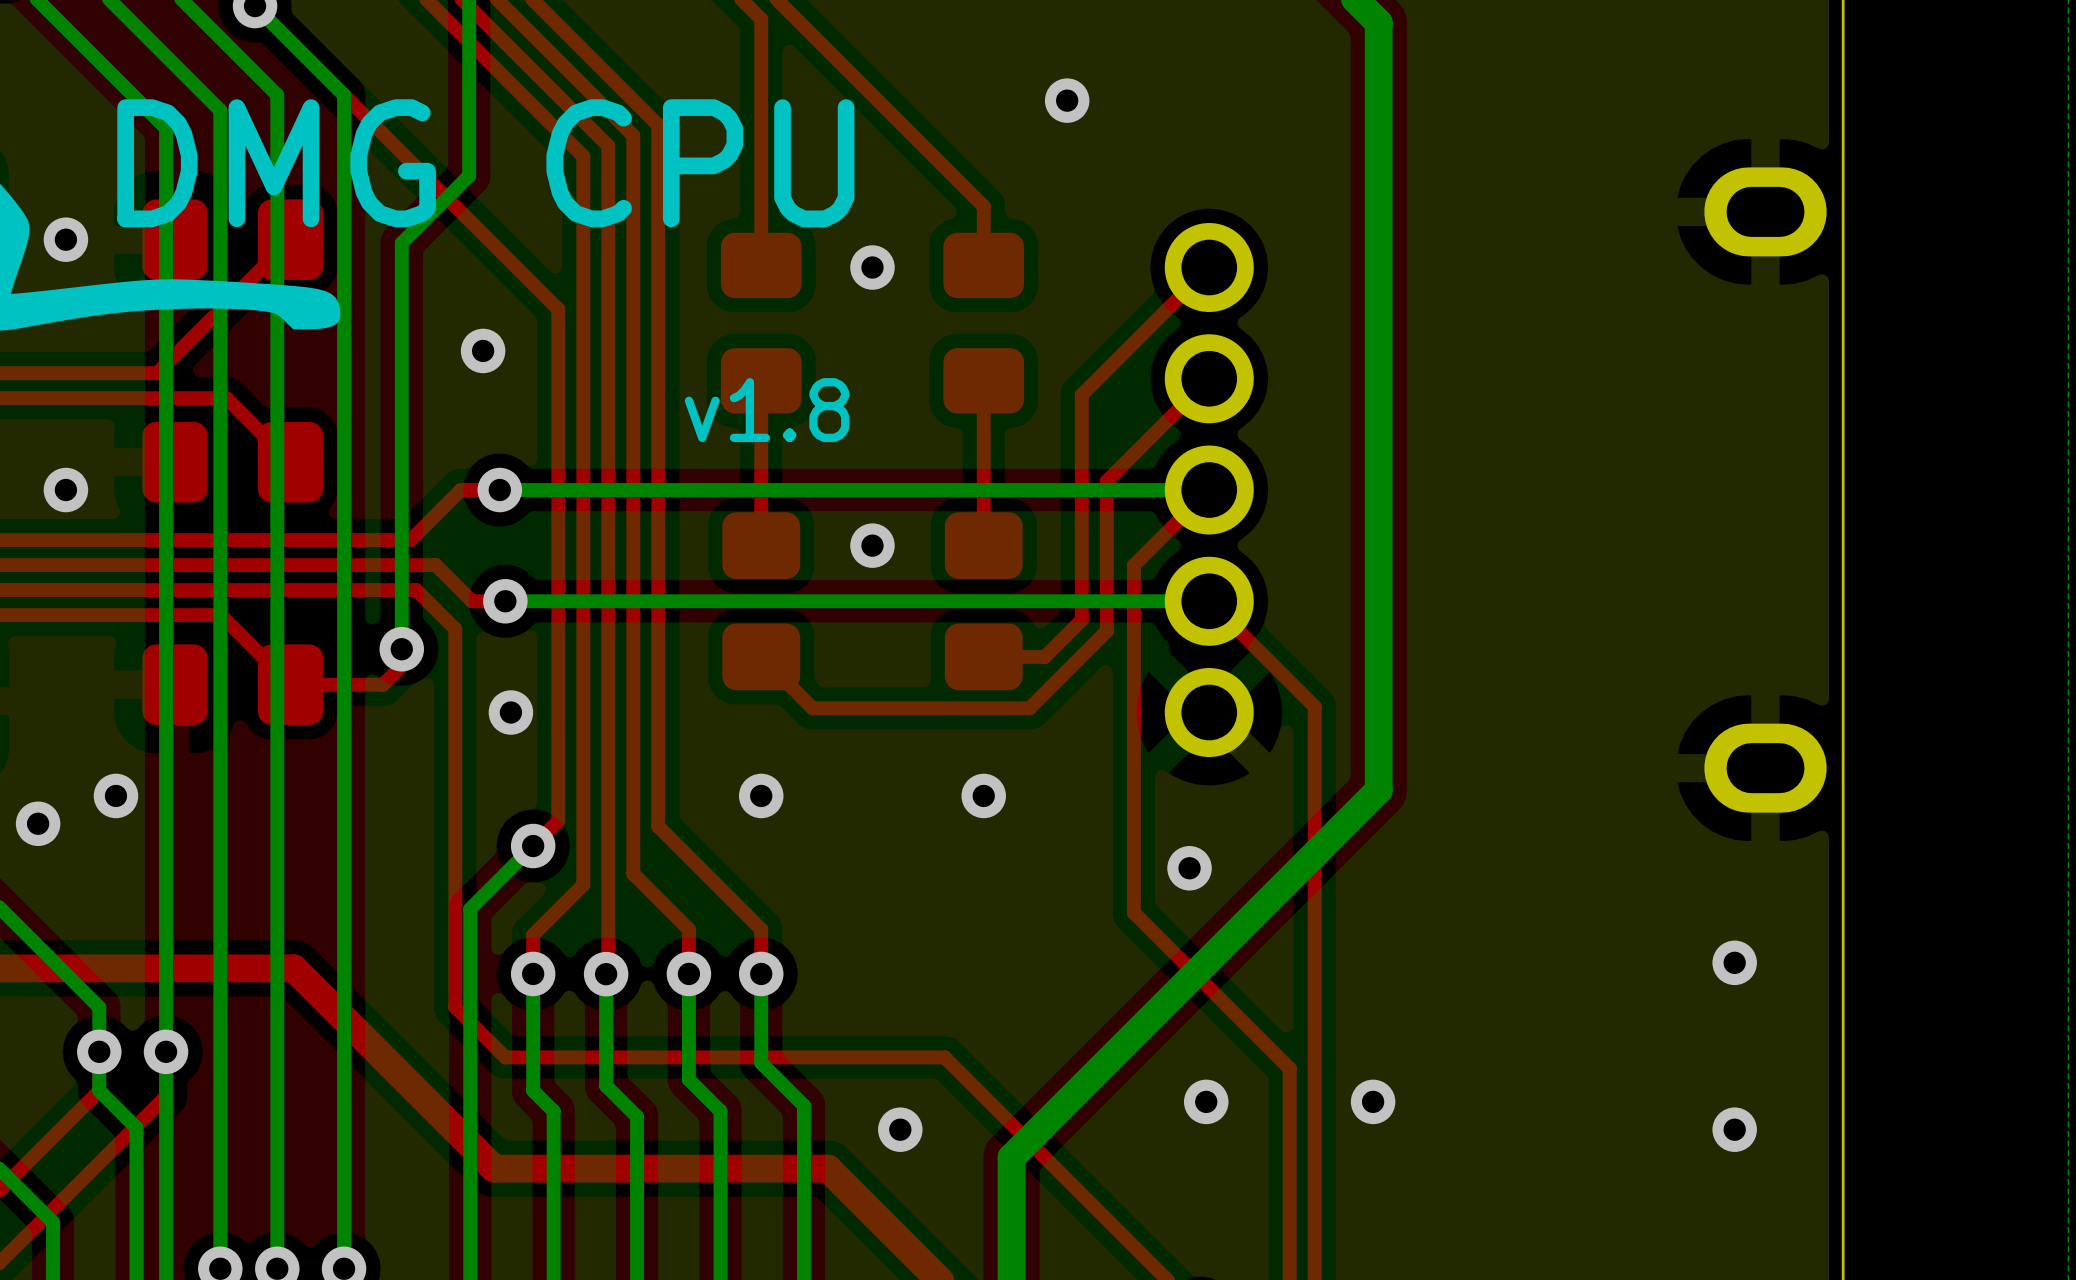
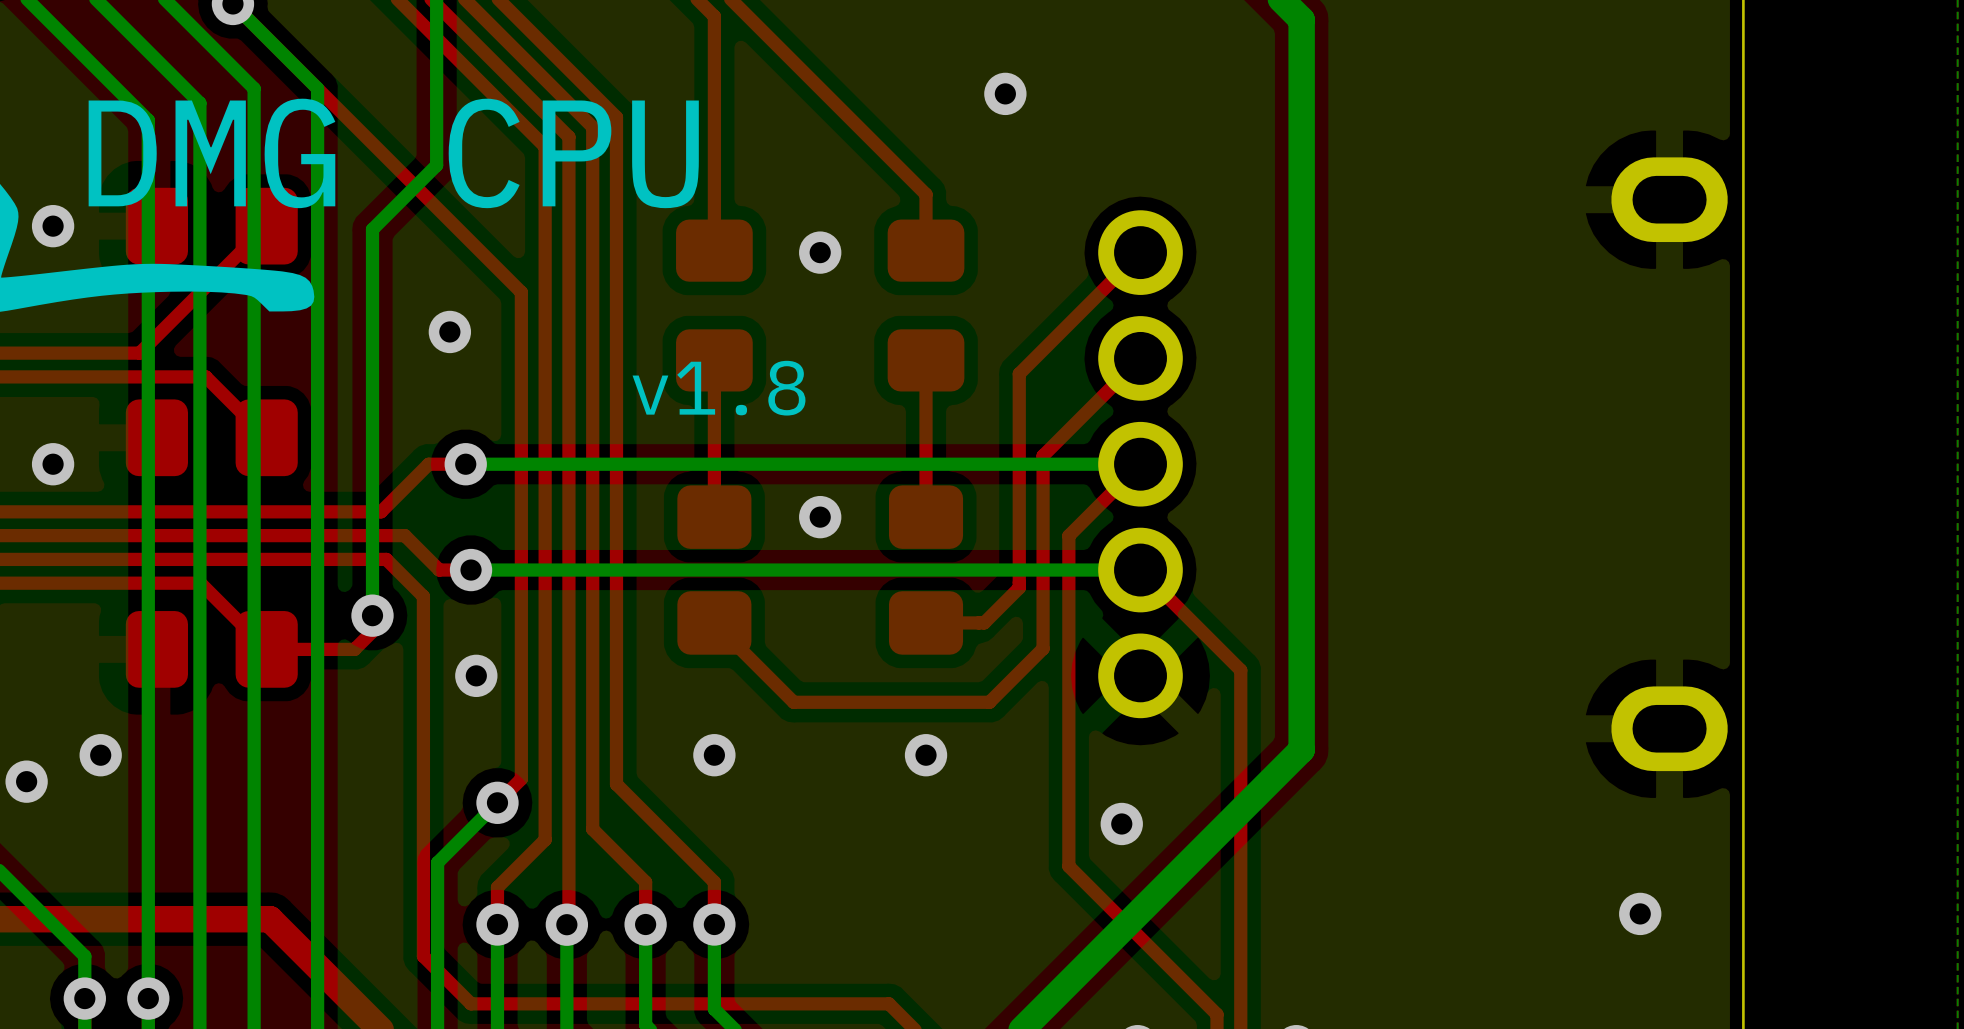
top track: (1106, 631) (1029, 708) (812, 708) -> (1043, 598) (1043, 648) (989, 702) (793, 702) (763, 671)

